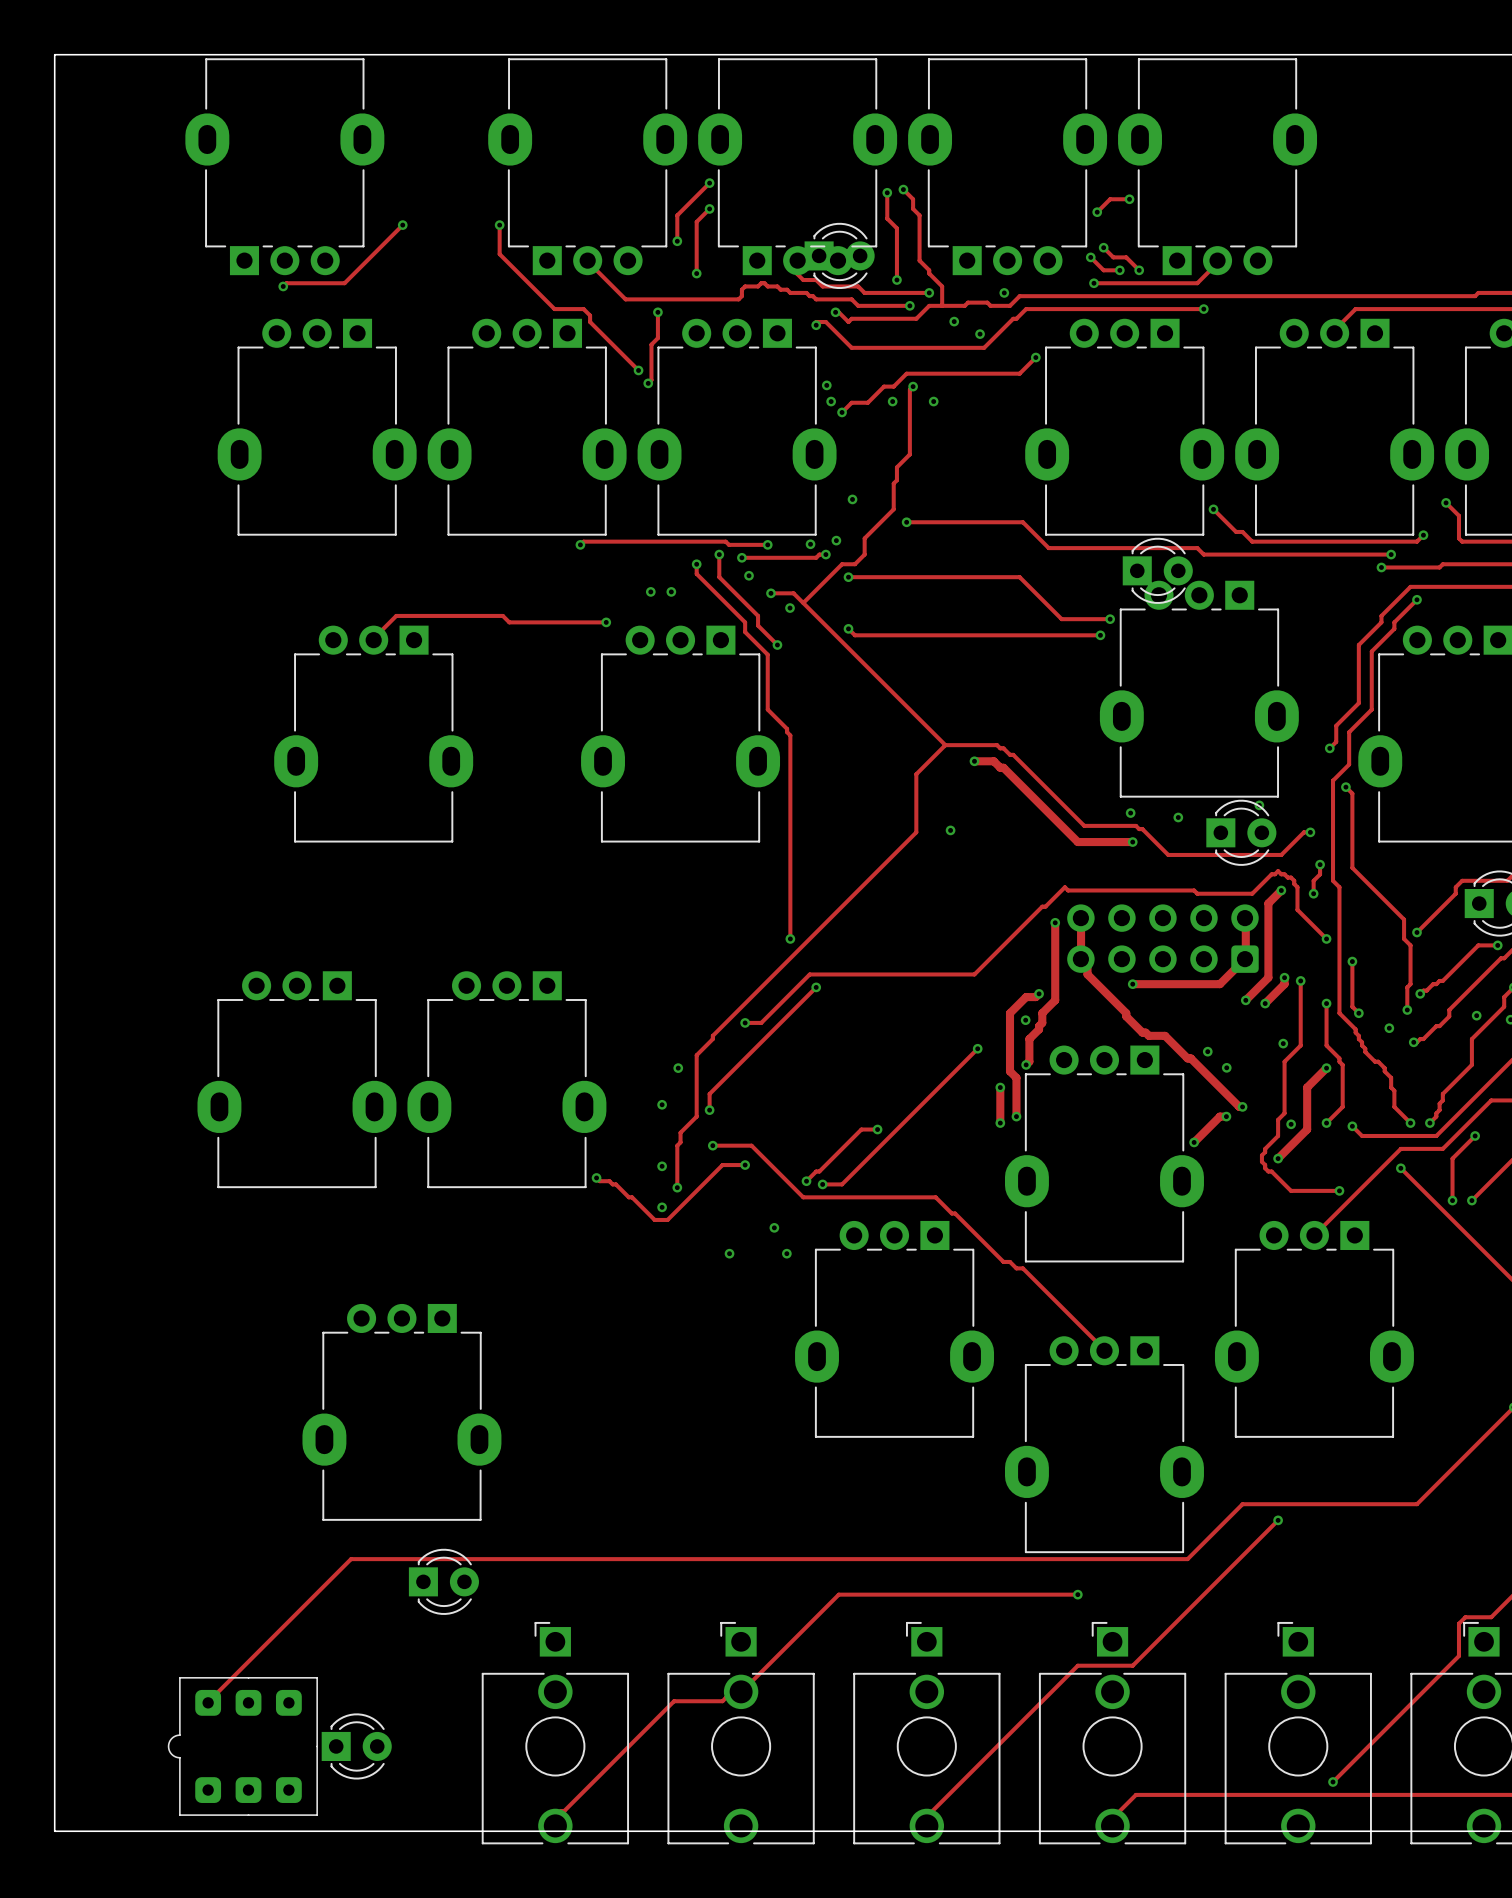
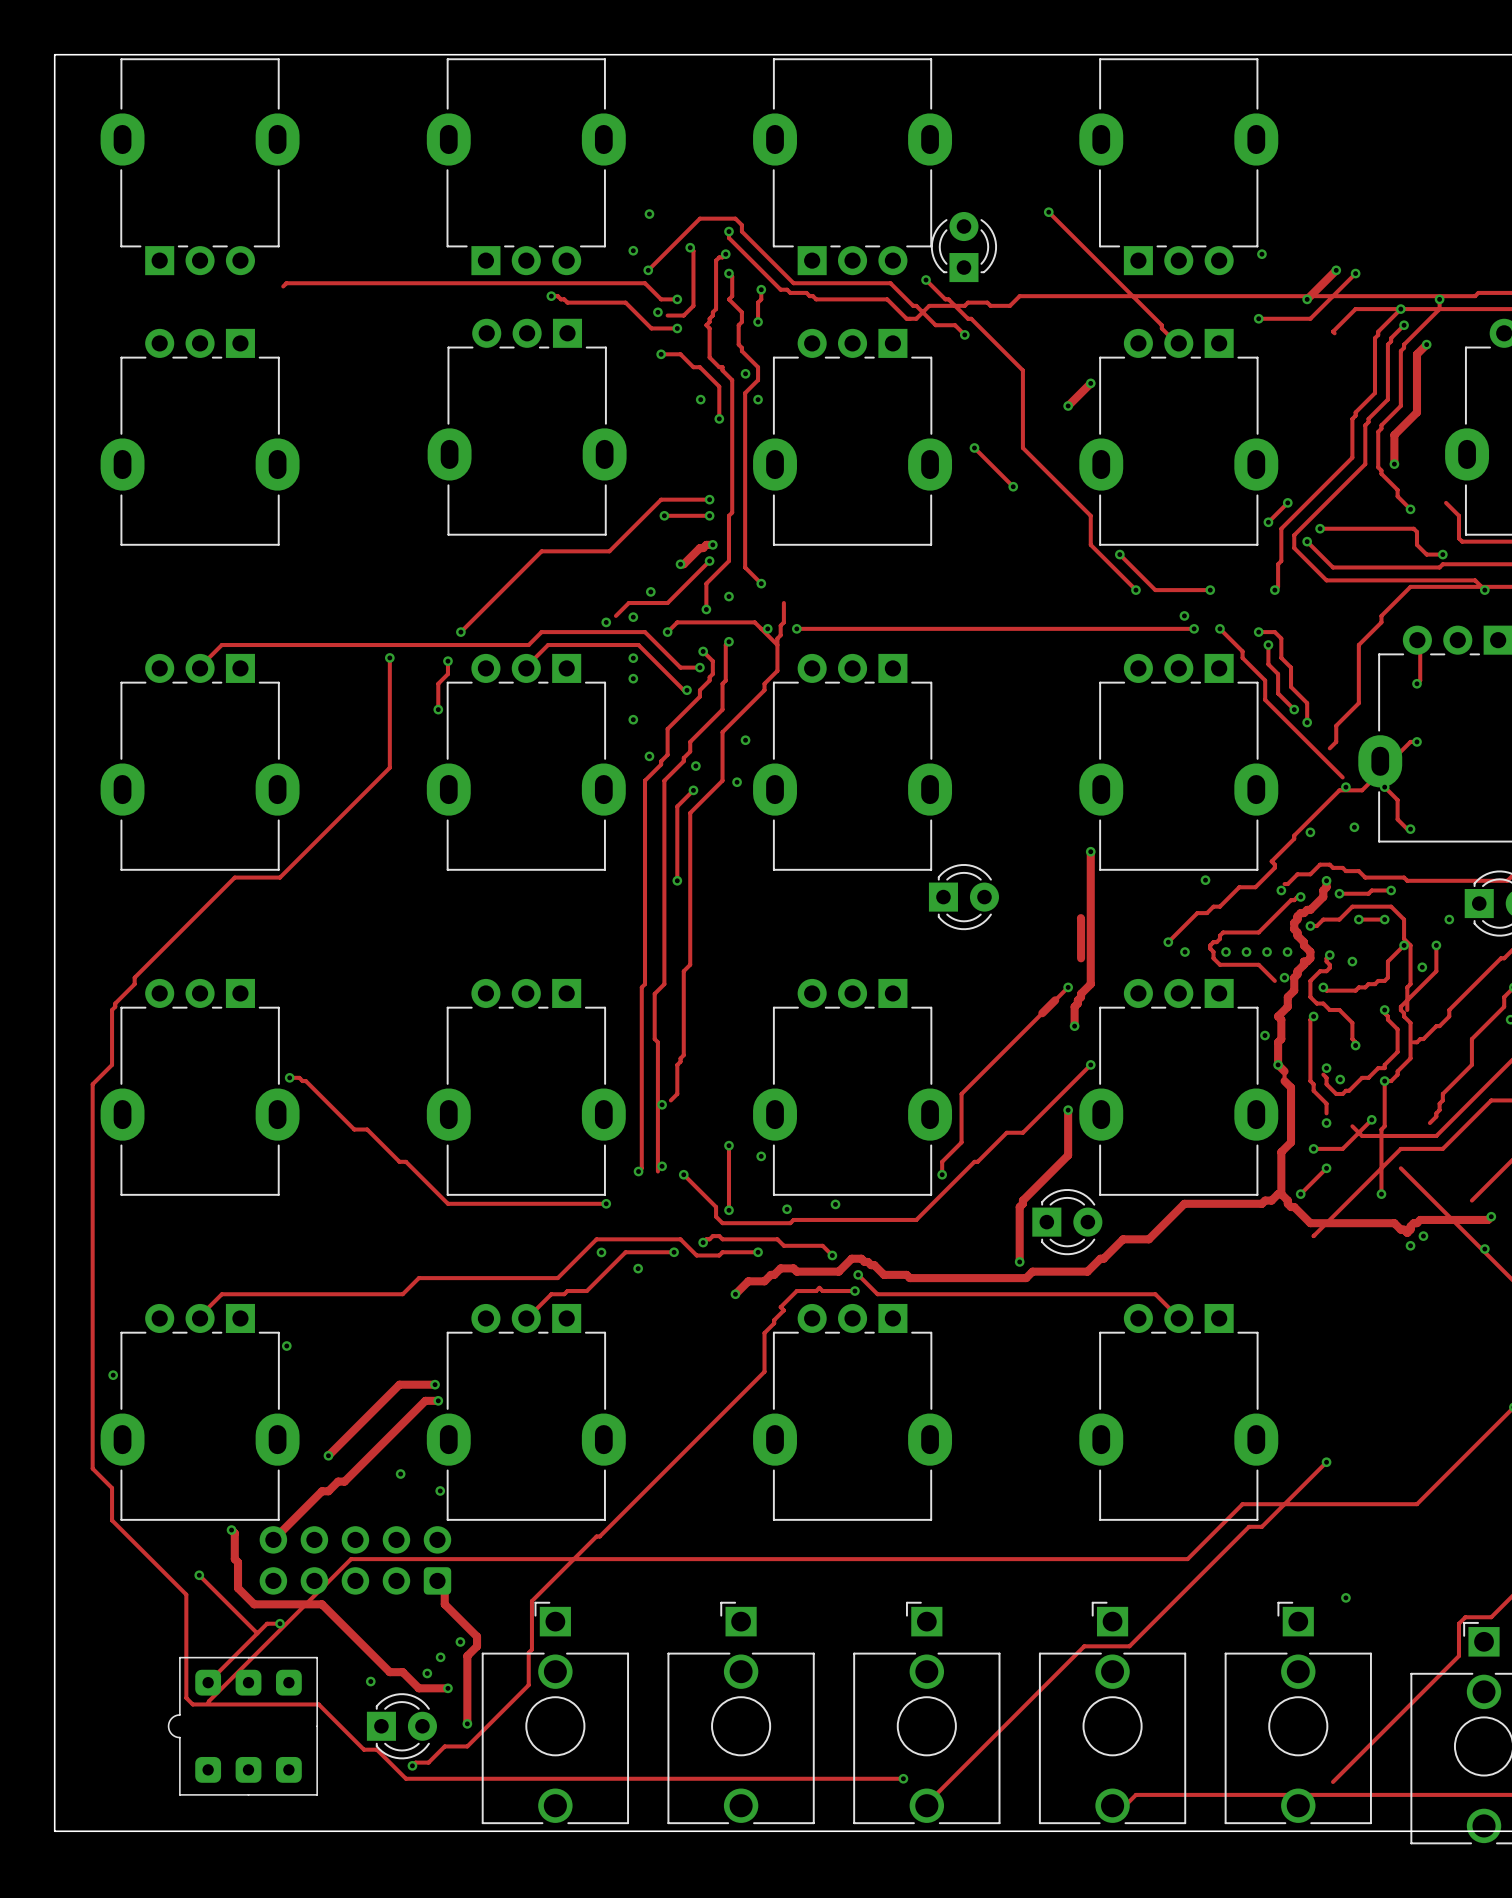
part position: (284, 166) -> (200, 166)
part position: (587, 166) -> (526, 166)
part position: (797, 166) -> (852, 166)
part: (1007, 166) -> none
part position: (1217, 166) -> (1178, 166)
track: (709, 183) (677, 215) (677, 241) -> none
via: (709, 183) -> none
track: (903, 189) (913, 199) (913, 208) (919, 215) (919, 260) (942, 286) (942, 305) -> none
via: (903, 189) -> none
track: (887, 192) (887, 218) (896, 228) (896, 280) -> none
via: (887, 192) -> none
track: (1129, 199) (1110, 199) (1097, 212) -> none
via: (1129, 199) -> none
track: (709, 208) (699, 218) -> (964, 334) (955, 325) (935, 325) (890, 283) (793, 283) (741, 231) (741, 225) (735, 218) (699, 218)
via: (709, 208) -> none
track: none -> (1048, 212) (1161, 325) (1161, 328) (1178, 343)
via: none -> (1048, 212)
via: (1097, 212) -> none
via: none -> (649, 214)
track: (696, 221) (696, 273) -> (696, 221) (648, 270)
track: (402, 225) (344, 283) -> none
via: (402, 225) -> none
track: (499, 225) (499, 254) (554, 309) (583, 309) (590, 315) (590, 322) (638, 370) -> none
via: (499, 225) -> none
via: none -> (728, 231)
via: (677, 241) -> none
track: none -> (690, 247) (693, 250) (693, 305) (683, 315) (667, 315)
via: none -> (690, 247)
track: (1103, 247) (1113, 257) (1126, 257) (1139, 270) -> none
via: (1103, 247) -> none
via: none -> (633, 250)
track: none -> (725, 254) (716, 260) (716, 309) (706, 325) (709, 328) (709, 357) (719, 367) (722, 367) (722, 370) (732, 380) (732, 512) (728, 515) (728, 561) (706, 583) (706, 609)
via: none -> (725, 254)
via: none -> (1261, 254)
part rotation: 0° (839, 255) -> 90° counterclockwise (963, 247)
part position: (839, 255) -> (963, 247)
track: (1090, 257) (1103, 270) (1119, 270) -> none
via: (1090, 257) -> none
track: (587, 260) (625, 299) (661, 299) -> (344, 283) (645, 283) (661, 299)
track: (797, 260) (796, 273) (803, 280) (816, 280) (822, 286) (858, 286) (864, 292) (929, 292) -> none
track: (1217, 260) (1197, 283) (1093, 283) -> none
via: none -> (648, 270)
via: (1119, 270) -> none
via: (1139, 270) -> none
track: none -> (1336, 270) (1307, 299)
via: none -> (1336, 270)
via: (696, 273) -> none
track: none -> (728, 273) (732, 276) (732, 296) (728, 299) (741, 312) (741, 322) (738, 325) (738, 344) (741, 351) (758, 367) (758, 380) (745, 393) (745, 567) (761, 583)
via: none -> (728, 273)
track: none -> (1355, 273) (1310, 318) (1258, 318)
via: none -> (1355, 273)
via: (896, 280) -> none
track: none -> (926, 280) (968, 318) (971, 318) (1022, 370) (1022, 447) (1090, 515) (1090, 544) (1135, 590)
via: (1093, 283) -> none
via: (283, 286) -> none
track: (777, 286) (767, 286) (764, 283) (758, 286) (745, 286) (738, 299) (677, 299) -> (777, 286) (728, 238) (728, 231)
track: none -> (761, 289) (761, 299) (758, 302) (758, 322)
via: none -> (761, 289)
via position: (929, 292) -> (926, 280)
via: (1004, 292) -> none
track: none -> (551, 296) (557, 296) (567, 302) (625, 302) (651, 328) (677, 328)
via: none -> (551, 296)
via: none -> (677, 299)
track: (851, 299) (858, 305) (909, 305) -> (851, 299) (887, 299) (906, 318)
via: none -> (1307, 299)
track: none -> (1439, 299) (1439, 309) (1404, 344) (1400, 351) (1400, 405) (1381, 425) (1378, 431) (1378, 467) (1381, 473) (1397, 489) (1397, 496) (1410, 509)
via: none -> (1439, 299)
via: (909, 305) -> none
track: (1203, 309) (1026, 309) (1016, 318) (1013, 318) (984, 347) (851, 347) (825, 322) (816, 322) (816, 325) -> none
via: (1203, 309) -> none
track: none -> (1400, 309) (1378, 331) (1375, 338) (1375, 393) (1355, 412) (1352, 418) (1352, 457) (1281, 528) (1281, 561) (1278, 564) (1278, 586) (1274, 590)
via: none -> (1400, 309)
track: (657, 312) (657, 338) (651, 344) (651, 380) (648, 383) -> none
track: (835, 312) (838, 312) (848, 322) (851, 318) (906, 318) -> none
via: (835, 312) -> none
via: none -> (1258, 318)
via: (954, 321) -> none
via: none -> (758, 322)
via: (816, 325) -> none
track: none -> (1404, 325) (1391, 338) (1387, 344) (1387, 399) (1368, 418) (1365, 425) (1365, 464) (1294, 535) (1294, 548) (1326, 580) (1475, 580) (1484, 590)
via: none -> (1404, 325)
via: none -> (677, 328)
via: none -> (964, 334)
via: (980, 334) -> none
track: none -> (1426, 344) (1416, 354) (1416, 412) (1394, 435) (1394, 464)
via: none -> (1426, 344)
track: none -> (661, 354) (680, 354) (693, 367) (699, 367) (719, 386) (719, 418)
via: none -> (661, 354)
track: (1035, 357) (1019, 373) (906, 373) (893, 386) (884, 386) (867, 402) (851, 402) (842, 412) -> none
via: (1035, 357) -> none
via: (638, 370) -> none
via: none -> (745, 373)
via: (648, 383) -> none
track: none -> (1090, 383) (1068, 405)
via: none -> (1090, 383)
via: (826, 385) -> none
track: (913, 386) (909, 389) (909, 454) (896, 467) (896, 480) (893, 483) (893, 509) (864, 538) (864, 554) (854, 564) (842, 564) (803, 603) -> none
via: (913, 386) -> none
via: none -> (700, 399)
via: none -> (758, 399)
via: (831, 401) -> none
via: (892, 401) -> none
via: (933, 401) -> none
via: none -> (1068, 405)
via: (842, 412) -> none
via: none -> (719, 418)
part position: (317, 427) -> (200, 437)
part position: (737, 427) -> (852, 437)
part position: (1124, 427) -> (1178, 437)
part: (1334, 427) -> none
track: none -> (974, 447) (1013, 486)
via: none -> (974, 447)
via: none -> (1394, 464)
via: none -> (1013, 486)
track: none -> (709, 499) (661, 499) (609, 551) (541, 551) (460, 632)
via: none -> (709, 499)
via: (852, 499) -> none
track: none -> (1287, 502) (1268, 522)
via: none -> (1287, 502)
via: (1446, 502) -> none
track: (1213, 509) (1236, 531) (1242, 531) (1252, 541) (1416, 541) (1423, 535) -> none
via: (1213, 509) -> none
via: none -> (1410, 509)
track: none -> (664, 515) (709, 515)
via: none -> (664, 515)
via: none -> (709, 515)
track: (906, 522) (1022, 522) (1048, 548) (1197, 548) (1203, 554) (1391, 554) -> none
via: (906, 522) -> none
via: none -> (1268, 522)
track: none -> (1320, 528) (1413, 528) (1416, 531) (1416, 544) (1426, 554) (1442, 554)
via: none -> (1320, 528)
via: (1423, 535) -> none
via: (836, 540) -> none
track: none -> (1307, 541) (1333, 567) (1381, 567)
via: none -> (1307, 541)
track: (580, 544) (583, 541) (725, 541) (728, 544) (767, 544) -> none
via: (580, 544) -> none
track: none -> (712, 544) (706, 544) (699, 548) (683, 564) (680, 564)
via: none -> (712, 544)
via: (767, 544) -> none
via: (810, 544) -> none
track: (719, 554) (719, 577) (758, 615) (758, 625) -> (667, 632) (677, 622) (754, 622) (758, 625)
via: (719, 554) -> none
track: (825, 554) (819, 554) (816, 557) (741, 557) -> none
via: (825, 554) -> none
track: none -> (1119, 554) (1155, 590) (1210, 590)
via: none -> (1119, 554)
via: (1391, 554) -> none
via: none -> (1442, 554)
via: (741, 557) -> none
track: none -> (709, 561) (667, 603) (628, 603) (615, 615)
via: none -> (709, 561)
via: none -> (680, 564)
track: (696, 564) (696, 573) (745, 622) (745, 632) (767, 654) (767, 709) (787, 728) (790, 735) (790, 938) -> none
via: (696, 564) -> none
via: (1381, 567) -> none
part: (1157, 570) -> none
via: (749, 575) -> none
track: (848, 577) (1019, 577) (1061, 619) (1110, 619) -> none
via: (848, 577) -> none
via: none -> (761, 583)
via: none -> (1135, 590)
via: none -> (1210, 590)
via: none -> (1274, 590)
via: none -> (1484, 590)
via: (671, 591) -> none
track: (770, 593) (793, 593) (945, 745) -> none
via: (770, 593) -> none
via: none -> (728, 596)
track: (1416, 599) (1394, 622) (1394, 628) (1371, 651) (1371, 709) (1349, 732) (1349, 764) (1333, 780) (1333, 880) (1339, 887) (1339, 1013) (1355, 1029) (1365, 1051) (1375, 1061) (1378, 1061) (1391, 1077) (1391, 1087) (1394, 1090) (1394, 1106) (1410, 1123) -> none
via: (1416, 599) -> none
track: none -> (783, 603) (783, 622) (780, 625) (780, 635) (777, 638) (777, 670) (764, 683) (764, 690) (722, 732) (722, 780) (690, 812) (690, 964) (683, 971) (683, 1055) (677, 1064) (677, 1093) (670, 1100)
via: (790, 608) -> none
via: none -> (706, 609)
via: none -> (1184, 615)
via: none -> (633, 617)
via: (1110, 619) -> none
track: (606, 622) (509, 622) (502, 615) (396, 615) (373, 640) -> none
via: none -> (767, 628)
track: none -> (796, 628) (1194, 628)
via: none -> (796, 628)
track: (848, 628) (854, 635) (1100, 635) -> none
via: (848, 628) -> none
via: none -> (1194, 628)
track: none -> (1219, 628) (1242, 651) (1242, 657) (1265, 680) (1265, 699) (1342, 777)
via: none -> (1219, 628)
via: none -> (460, 632)
via: none -> (667, 632)
track: none -> (1258, 632) (1274, 632) (1281, 638) (1281, 657) (1291, 667) (1291, 687) (1307, 703) (1307, 722)
via: none -> (1258, 632)
track: none -> (1420, 632) (1420, 680) (1416, 683)
via: (1100, 635) -> none
track: none -> (728, 641) (725, 645) (725, 680) (722, 683) (722, 709) (690, 741) (690, 751) (683, 758) (683, 761) (664, 780) (664, 984) (654, 993) (654, 1039) (657, 1042) (657, 1171)
via: none -> (728, 641)
via: (777, 645) -> none
track: none -> (1268, 645) (1268, 664) (1278, 674) (1278, 693) (1294, 709)
via: none -> (1268, 645)
track: none -> (703, 651) (712, 661) (712, 674) (709, 680) (699, 690) (699, 696) (667, 728) (667, 754) (661, 761) (661, 764) (645, 780) (645, 984) (641, 987) (641, 1168) (638, 1171)
via: none -> (703, 651)
track: none -> (389, 657) (389, 767) (280, 877) (234, 877) (134, 977) (134, 984) (115, 1003) (112, 1010) (112, 1064) (92, 1084) (92, 1468) (112, 1488) (112, 1520) (186, 1594) (186, 1698) (192, 1704) (318, 1704) (363, 1749) (376, 1749) (405, 1778) (903, 1778)
via: none -> (389, 657)
via: none -> (633, 658)
track: none -> (447, 661) (447, 674) (438, 683) (438, 709)
via: none -> (447, 661)
track: none -> (699, 667) (680, 667) (645, 632) (541, 632) (528, 645) (221, 645) (200, 668)
via: none -> (699, 667)
track: none -> (526, 668) (548, 645) (638, 645) (683, 690) (687, 690)
via: none -> (633, 678)
via: none -> (1416, 683)
part position: (1199, 689) -> (1178, 762)
via: none -> (687, 690)
via: none -> (438, 709)
via: none -> (1294, 709)
via: none -> (633, 719)
via: none -> (1307, 722)
part: (373, 734) -> none
part: (680, 734) -> none
via: none -> (745, 740)
track: none -> (1416, 741) (1410, 741) (1362, 790) (1339, 790) (1271, 861) (1274, 867) (1255, 887) (1239, 887) (1219, 906) (1213, 906) (1207, 913) (1197, 913) (1168, 942)
via: none -> (1416, 741)
track: (945, 745) (997, 745) (1010, 754) (1013, 754) (1084, 825) (1135, 825) (1142, 829) (1168, 854) (1281, 854) (1303, 832) (1310, 832) -> none
track: (945, 745) (916, 774) (916, 832) (712, 1035) (712, 1039) (696, 1055) (696, 1116) (680, 1132) (680, 1142) (677, 1145) (677, 1187) -> none
via: (1329, 748) -> none
via: none -> (649, 756)
track: (974, 761) (993, 761) (1000, 767) (1003, 767) (1077, 842) (1132, 842) -> none
via: (974, 761) -> none
part: none -> (200, 762)
part: none -> (526, 762)
part: none -> (852, 762)
via: none -> (695, 766)
via: none -> (737, 782)
track: (1345, 787) (1352, 793) (1352, 867) (1391, 906) -> (1310, 926) (1316, 926) (1323, 919) (1339, 919) (1352, 906) (1391, 906)
track: none -> (1384, 787) (1397, 800) (1397, 819) (1407, 829) (1410, 829)
via: none -> (1384, 787)
track: none -> (693, 790) (677, 806) (677, 880)
via: none -> (693, 790)
via: (1259, 805) -> none
via: (1130, 813) -> none
via: (1178, 817) -> none
via: none -> (1354, 827)
via: none -> (1410, 829)
via: (950, 830) -> none
part: (1241, 832) -> none
via: (1132, 842) -> none
track: none -> (1090, 851) (1090, 984) (1081, 993) (1074, 1006) (1074, 1026)
via: none -> (1090, 851)
track: (1320, 864) (1320, 874) (1313, 880) (1313, 893) -> none
via: (1320, 864) -> none
via: none -> (677, 880)
via: none -> (1205, 880)
via: none -> (1326, 880)
track: (1462, 880) (1455, 887) (1455, 893) (1416, 932) -> (1462, 880) (1407, 880) (1404, 877) (1365, 877) (1358, 871) (1345, 871) (1342, 867) (1333, 867) (1329, 864) (1320, 864) (1310, 874) (1297, 874) (1287, 884) (1284, 884)
track: (1281, 890) (1268, 903) (1268, 977) (1245, 1000) -> none
track: none -> (1391, 890) (1371, 890) (1368, 893) (1339, 893)
via: none -> (1391, 890)
via: (1313, 893) -> none
via: none -> (1339, 893)
track: none -> (1300, 896) (1291, 900) (1258, 932) (1223, 932) (1219, 938) (1210, 945) (1213, 951) (1213, 958) (1219, 964) (1258, 964) (1274, 980)
via: none -> (1300, 896)
part: none -> (963, 897)
track: (1244, 918) (1245, 958) (1219, 984) (1132, 984) -> none
track: none -> (1358, 919) (1384, 919)
via: none -> (1358, 919)
via: none -> (1384, 919)
via: none -> (1449, 919)
track: (1055, 922) (1055, 1000) -> (1068, 987) (1055, 1000)
via: (1055, 922) -> none
via: none -> (1310, 926)
via: (1416, 932) -> none
via: (790, 938) -> none
part: (1162, 938) -> none
track: (1326, 938) (1297, 909) (1297, 887) (1294, 880) (1278, 871) (1271, 874) (1252, 893) (1197, 893) (1194, 890) (1068, 890) (1064, 887) (1045, 906) (1042, 906) (974, 974) (809, 974) (761, 1022) (745, 1022) -> none
via: (1326, 938) -> none
via: none -> (1168, 942)
track: none -> (1404, 945) (1387, 961) (1387, 977) (1384, 980) (1378, 980) (1375, 984) (1368, 984) (1355, 990) (1326, 990) (1323, 987)
via: none -> (1404, 945)
track: none -> (1436, 945) (1436, 971) (1400, 1006) (1404, 1016) (1410, 1022) (1410, 1058) (1391, 1081) (1384, 1081) (1384, 1126) (1381, 1129) (1381, 1194)
via: none -> (1436, 945)
track: (1497, 945) (1478, 945) (1442, 980) (1433, 984) (1420, 993) -> none
via: (1497, 945) -> none
via: none -> (1184, 952)
via: none -> (1226, 952)
via: none -> (1246, 952)
via: none -> (1267, 952)
via: none -> (1287, 952)
track: none -> (1329, 955) (1326, 958) (1329, 968) (1326, 971) (1320, 971) (1310, 980) (1310, 997) (1316, 1003) (1323, 1003) (1329, 1010) (1339, 1010) (1352, 1022) (1352, 1039) (1355, 1045)
via: none -> (1329, 955)
track: (1080, 959) (1087, 964) (1087, 974) (1126, 1013) (1126, 1016) (1142, 1032) (1148, 1035) (1165, 1035) (1187, 1058) (1190, 1058) (1239, 1106) (1242, 1106) -> none
track: (1352, 961) (1352, 1006) (1358, 1013) -> none
via: none -> (1422, 967)
track: (1284, 977) (1284, 984) (1265, 1003) -> none
track: (1300, 980) (1300, 1045) (1284, 1061) (1284, 1071) -> (1326, 880) (1323, 896) (1310, 909) (1300, 913) (1294, 922) (1294, 929) (1297, 935) (1310, 951) (1310, 958) (1303, 961) (1303, 964) (1297, 971) (1294, 977) (1294, 990) (1287, 997) (1287, 1006) (1278, 1016) (1281, 1019) (1281, 1039) (1278, 1042) (1278, 1064) (1284, 1071)
via: (1300, 980) -> none
via: (1132, 984) -> none
track: (816, 987) (709, 1093) (709, 1110) -> none
via: (816, 987) -> none
via: none -> (1068, 987)
via: none -> (1323, 987)
track: (1039, 993) (1035, 997) (1026, 997) (1010, 1013) (1010, 1071) (1016, 1077) (1016, 1116) -> none
via: (1039, 993) -> none
via: (1420, 993) -> none
via: (1245, 1000) -> none
via: (1265, 1003) -> none
track: (1326, 1003) (1326, 1045) (1339, 1058) (1342, 1064) (1342, 1106) (1326, 1123) -> none
via: (1326, 1003) -> none
track: none -> (1384, 1010) (1387, 1019) (1397, 1029) (1397, 1051) (1384, 1064) (1384, 1068) (1378, 1068) (1368, 1077) (1362, 1077) (1349, 1090) (1342, 1093) (1336, 1093) (1326, 1084) (1326, 1077) (1323, 1074)
via: none -> (1384, 1010)
via: (1407, 1010) -> none
track: (1042, 1013) (1042, 1022) (1039, 1029) (1029, 1039) (1029, 1061) (1026, 1064) -> (1042, 1013) (961, 1093) (961, 1142) (942, 1161) (942, 1174)
via: (1358, 1013) -> none
via: (1476, 1015) -> none
track: none -> (1313, 1016) (1310, 1019) (1310, 1081) (1313, 1084) (1313, 1090) (1326, 1103) (1326, 1113)
via: none -> (1313, 1016)
via: (1025, 1020) -> none
via: (745, 1022) -> none
via: none -> (1074, 1026)
via: (1389, 1028) -> none
via: none -> (1264, 1035)
via: (1413, 1042) -> none
via: (1283, 1043) -> none
via: none -> (1355, 1045)
track: (977, 1048) (842, 1184) (822, 1184) -> none
via: (977, 1048) -> none
via: (1207, 1051) -> none
via: (1026, 1064) -> none
track: none -> (1090, 1064) (1022, 1132) (1006, 1132) (916, 1219) (793, 1219) (790, 1223) (722, 1223) (716, 1216) (716, 1207) (683, 1174)
via: none -> (1090, 1064)
via: none -> (1278, 1064)
via: (1226, 1067) -> none
via: (678, 1068) -> none
track: (1326, 1068) (1307, 1087) (1307, 1129) (1278, 1158) -> none
track: none -> (289, 1077) (299, 1077) (305, 1081) (354, 1129) (367, 1129) (399, 1161) (405, 1161) (447, 1203) (606, 1203)
via: none -> (289, 1077)
part position: (296, 1079) -> (200, 1087)
part position: (506, 1079) -> (526, 1087)
via: none -> (1340, 1079)
track: (1284, 1081) (1284, 1113) (1278, 1119) (1278, 1135) (1265, 1148) (1261, 1155) (1261, 1161) (1265, 1168) (1271, 1171) (1291, 1190) (1339, 1190) -> (1284, 1081) (1291, 1087) (1291, 1142) (1281, 1152) (1281, 1194)
via: none -> (1384, 1081)
part: none -> (852, 1087)
track: (1000, 1087) (1000, 1123) -> none
via: (1000, 1087) -> none
via: (1242, 1106) -> none
via: (709, 1110) -> none
track: none -> (1068, 1110) (1068, 1155) (1022, 1200) (1019, 1207) (1019, 1261)
via: none -> (1068, 1110)
via: (1016, 1116) -> none
track: (1226, 1116) (1219, 1116) (1194, 1142) -> none
via: (1226, 1116) -> none
track: none -> (1371, 1119) (1342, 1148) (1313, 1148)
via: none -> (1371, 1119)
via: (1000, 1123) -> none
via: (1410, 1123) -> none
via: (1429, 1123) -> none
via: (1291, 1124) -> none
via: (1352, 1126) -> none
track: (877, 1129) (861, 1129) (819, 1171) (816, 1171) (806, 1181) -> none
via: (877, 1129) -> none
track: (1475, 1135) (1452, 1158) (1452, 1200) -> none
via: (1475, 1135) -> none
via: (1194, 1142) -> none
track: (712, 1145) (751, 1145) (803, 1197) (935, 1197) (951, 1213) (955, 1213) (1003, 1261) (1010, 1261) (1016, 1268) (1022, 1268) (1104, 1350) -> none
via: (712, 1145) -> none
track: none -> (728, 1145) (728, 1210)
via: none -> (728, 1145)
via: none -> (1313, 1148)
part position: (1104, 1153) -> (1178, 1087)
via: none -> (761, 1156)
via: (1278, 1158) -> none
track: (745, 1165) (722, 1165) (667, 1219) (654, 1219) (615, 1184) (609, 1181) (599, 1181) (596, 1177) -> none
via: (745, 1165) -> none
track: none -> (1326, 1168) (1300, 1194)
via: none -> (1326, 1168)
via: (1400, 1168) -> none
via: none -> (638, 1171)
via: none -> (942, 1174)
via: (596, 1177) -> none
via: (806, 1181) -> none
via: (822, 1184) -> none
via position: (677, 1187) -> (683, 1174)
via: (1339, 1190) -> none
track: none -> (1281, 1194) (1261, 1203) (1184, 1203) (1148, 1239) (1123, 1239) (1087, 1271) (1032, 1271) (1026, 1278) (909, 1278) (906, 1274) (884, 1274) (874, 1265) (861, 1258) (851, 1258) (838, 1271) (796, 1271) (793, 1268) (780, 1268) (764, 1281) (748, 1281) (735, 1294)
track: none -> (1281, 1194) (1287, 1200) (1287, 1203) (1294, 1207) (1310, 1223) (1394, 1223) (1407, 1232) (1410, 1226) (1420, 1219) (1488, 1219) (1491, 1216)
via: none -> (1300, 1194)
via: none -> (1381, 1194)
via: (1452, 1200) -> none
via: (1471, 1200) -> none
via: none -> (606, 1203)
via: none -> (835, 1204)
via: (662, 1207) -> none
via: none -> (787, 1209)
via: none -> (728, 1210)
via: none -> (1491, 1216)
part: none -> (1067, 1222)
via: (774, 1227) -> none
via: none -> (1423, 1236)
track: none -> (703, 1242) (712, 1236) (719, 1236) (722, 1239) (777, 1239) (783, 1245) (822, 1245) (832, 1255)
via: none -> (703, 1242)
via: none -> (1410, 1245)
via: none -> (1484, 1249)
via: none -> (601, 1252)
track: none -> (674, 1252) (625, 1252) (586, 1291) (567, 1291) (564, 1294) (551, 1294) (535, 1310) (531, 1310) (525, 1316) (526, 1318)
via: none -> (674, 1252)
track: none -> (758, 1252) (722, 1252) (719, 1255) (696, 1255) (680, 1239) (596, 1239) (557, 1278) (418, 1278) (402, 1294) (221, 1294) (199, 1316) (200, 1318)
via: none -> (758, 1252)
via: (729, 1253) -> none
via: (786, 1253) -> none
via: none -> (832, 1255)
via: none -> (1019, 1261)
via: none -> (638, 1268)
track: none -> (858, 1274) (877, 1294) (1155, 1294) (1178, 1318)
via: none -> (858, 1274)
track: none -> (854, 1291) (822, 1291) (819, 1287) (816, 1291) (796, 1291) (780, 1307) (783, 1310) (764, 1333) (764, 1371) (599, 1536) (596, 1536) (531, 1601) (531, 1649) (528, 1652) (528, 1685) (467, 1746) (444, 1746) (428, 1762) (415, 1762) (412, 1765)
via: none -> (854, 1291)
via: none -> (735, 1294)
part position: (894, 1329) -> (852, 1412)
part: (1314, 1329) -> none
via: none -> (286, 1346)
via: none -> (113, 1375)
track: none -> (435, 1384) (399, 1384) (328, 1455)
via: none -> (435, 1384)
track: none -> (438, 1400) (425, 1400) (344, 1481) (338, 1481) (328, 1491) (322, 1491) (273, 1539)
via: none -> (438, 1400)
part: none -> (200, 1412)
part: (401, 1412) -> none
part: none -> (526, 1412)
part: none -> (1178, 1412)
part: (1104, 1444) -> none
via: none -> (328, 1455)
track: none -> (1326, 1462) (1261, 1526) (1249, 1526) (1129, 1646) (1084, 1646) (926, 1805)
via: none -> (1326, 1462)
via: none -> (400, 1474)
via: none -> (440, 1490)
track: (1278, 1520) (1132, 1665) (1077, 1665) (926, 1817) -> none
via: (1278, 1520) -> none
track: none -> (231, 1530) (234, 1533) (234, 1559) (238, 1562) (238, 1588) (254, 1604) (322, 1604) (389, 1672) (402, 1672) (418, 1688) (447, 1688)
via: none -> (231, 1530)
part: none -> (355, 1560)
track: none -> (199, 1575) (257, 1633)
via: none -> (199, 1575)
track: none -> (437, 1580) (444, 1588) (444, 1604) (477, 1636) (477, 1646) (467, 1656) (467, 1723)
part: (443, 1581) -> none
track: (1077, 1594) (838, 1594) (741, 1691) -> none
via: (1077, 1594) -> none
via: none -> (1345, 1597)
track: none -> (280, 1623) (267, 1623) (208, 1682)
via: none -> (280, 1623)
via: none -> (460, 1641)
via: none -> (440, 1657)
via: none -> (427, 1673)
via: none -> (370, 1681)
via: none -> (447, 1688)
track: (741, 1691) (722, 1701) (674, 1701) (564, 1811) (561, 1811) (554, 1817) -> none
via: none -> (467, 1723)
part position: (555, 1733) -> (555, 1712)
part position: (741, 1733) -> (741, 1712)
part position: (926, 1733) -> (926, 1712)
part position: (1112, 1733) -> (1112, 1712)
part position: (1298, 1733) -> (1298, 1712)
part position: (242, 1746) -> (242, 1726)
part position: (356, 1746) -> (401, 1726)
via: none -> (412, 1765)
via: none -> (903, 1778)
via: (1333, 1781) -> none

